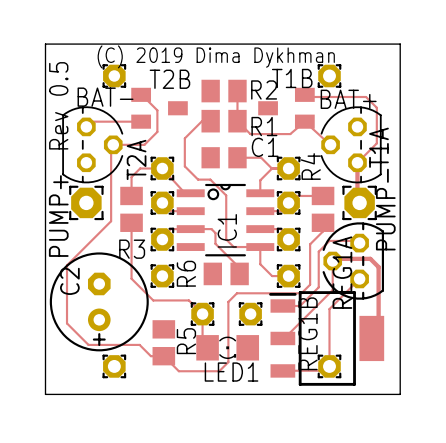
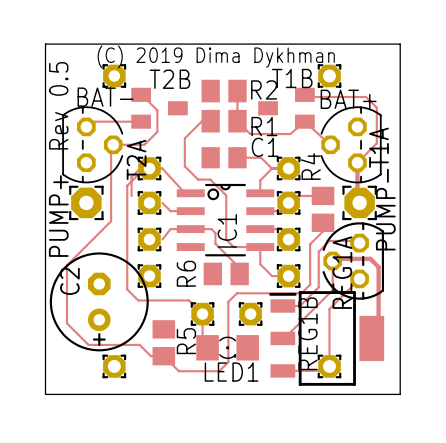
part position: (162, 168) -> (149, 168)
part position: (162, 202) -> (149, 202)
R3: (131, 209) -> none
track: (131, 222) (131, 278) (153, 300) -> (144, 168) (127, 185) (127, 289) (138, 300) (153, 300)
part position: (162, 239) -> (149, 239)
part position: (162, 276) -> (149, 276)

